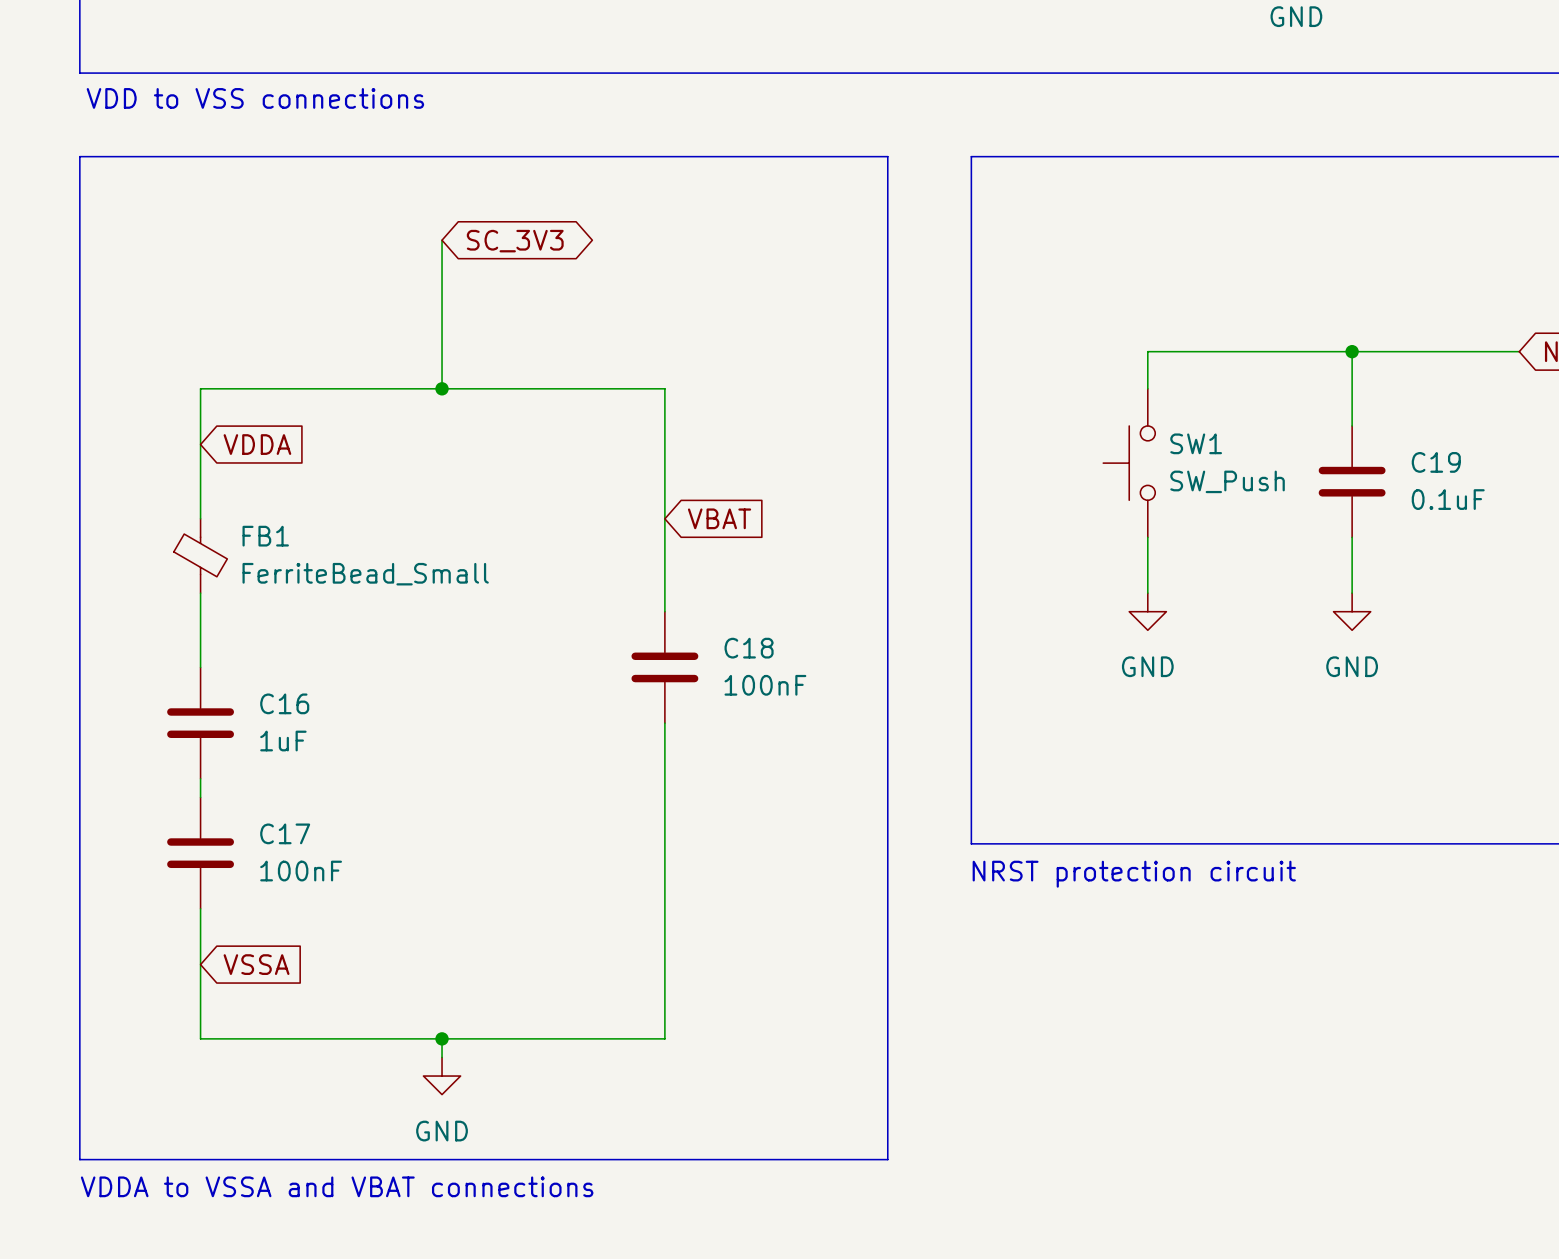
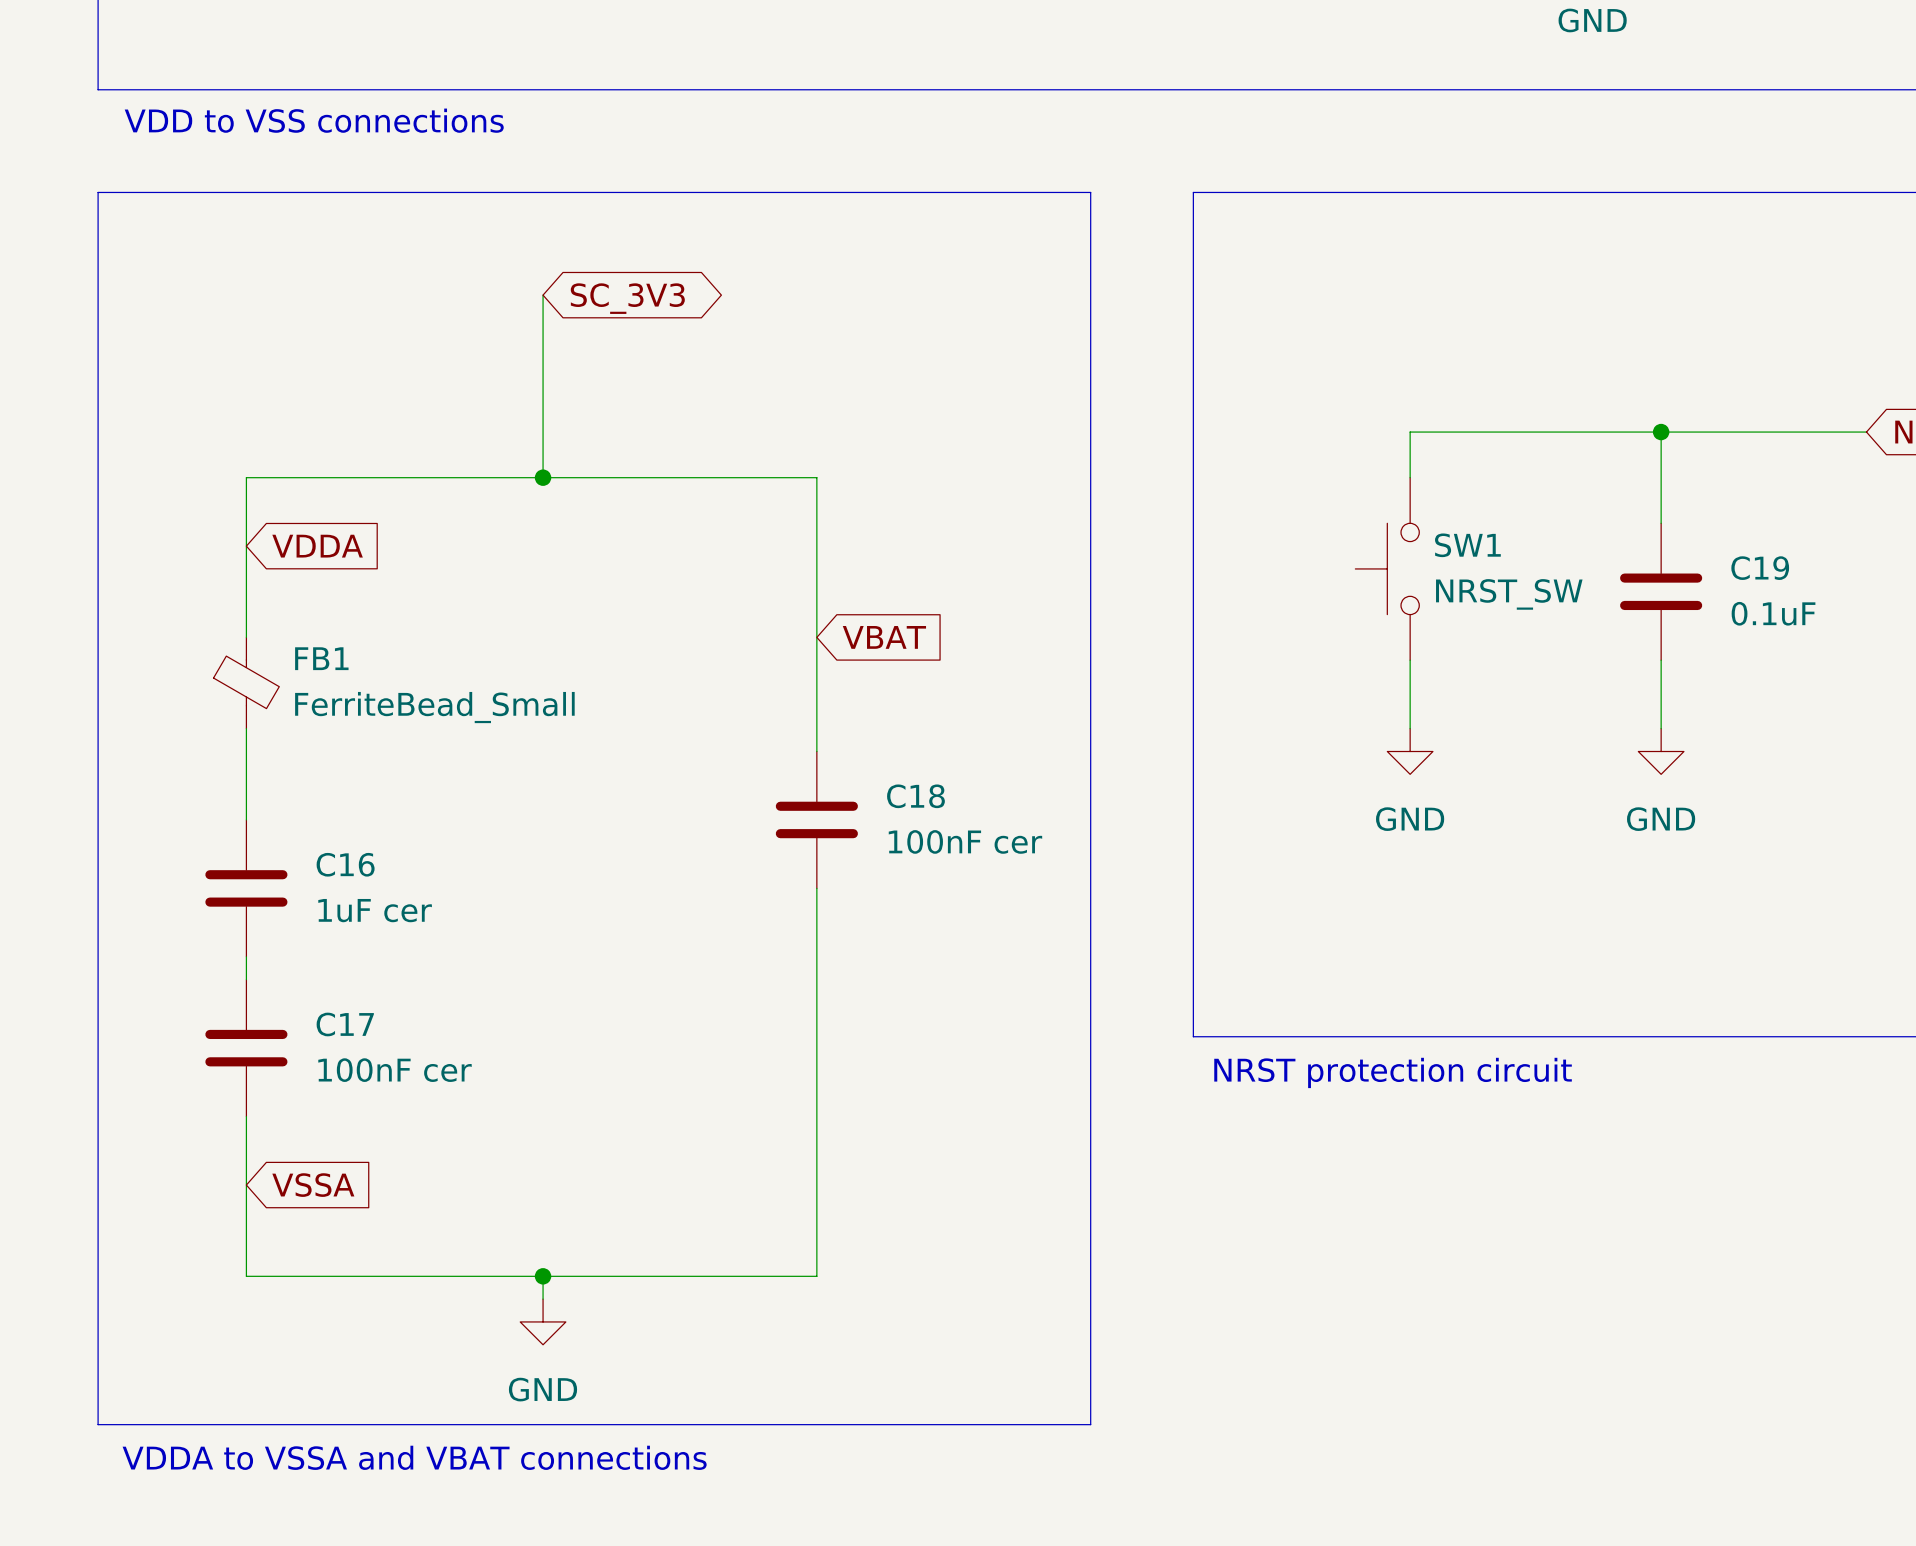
SW1 value: SW_Push (1227, 481) -> NRST_SW (1509, 594)
C18 value: 100nF (765, 685) -> 100nF cer (965, 841)
C16 value: 1uF (283, 741) -> 1uF cer (375, 910)
C17 value: 100nF (301, 871) -> 100nF cer (395, 1070)

